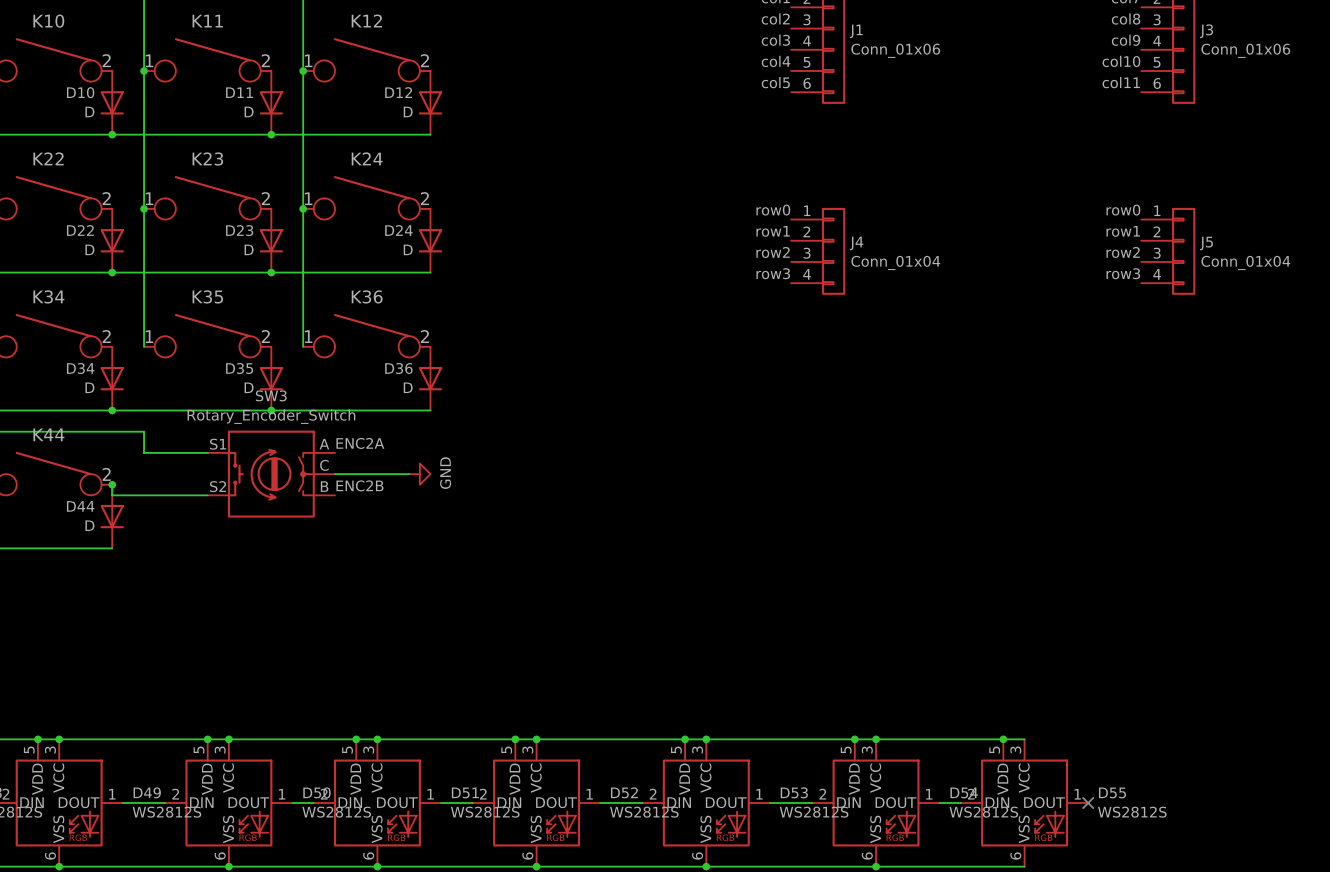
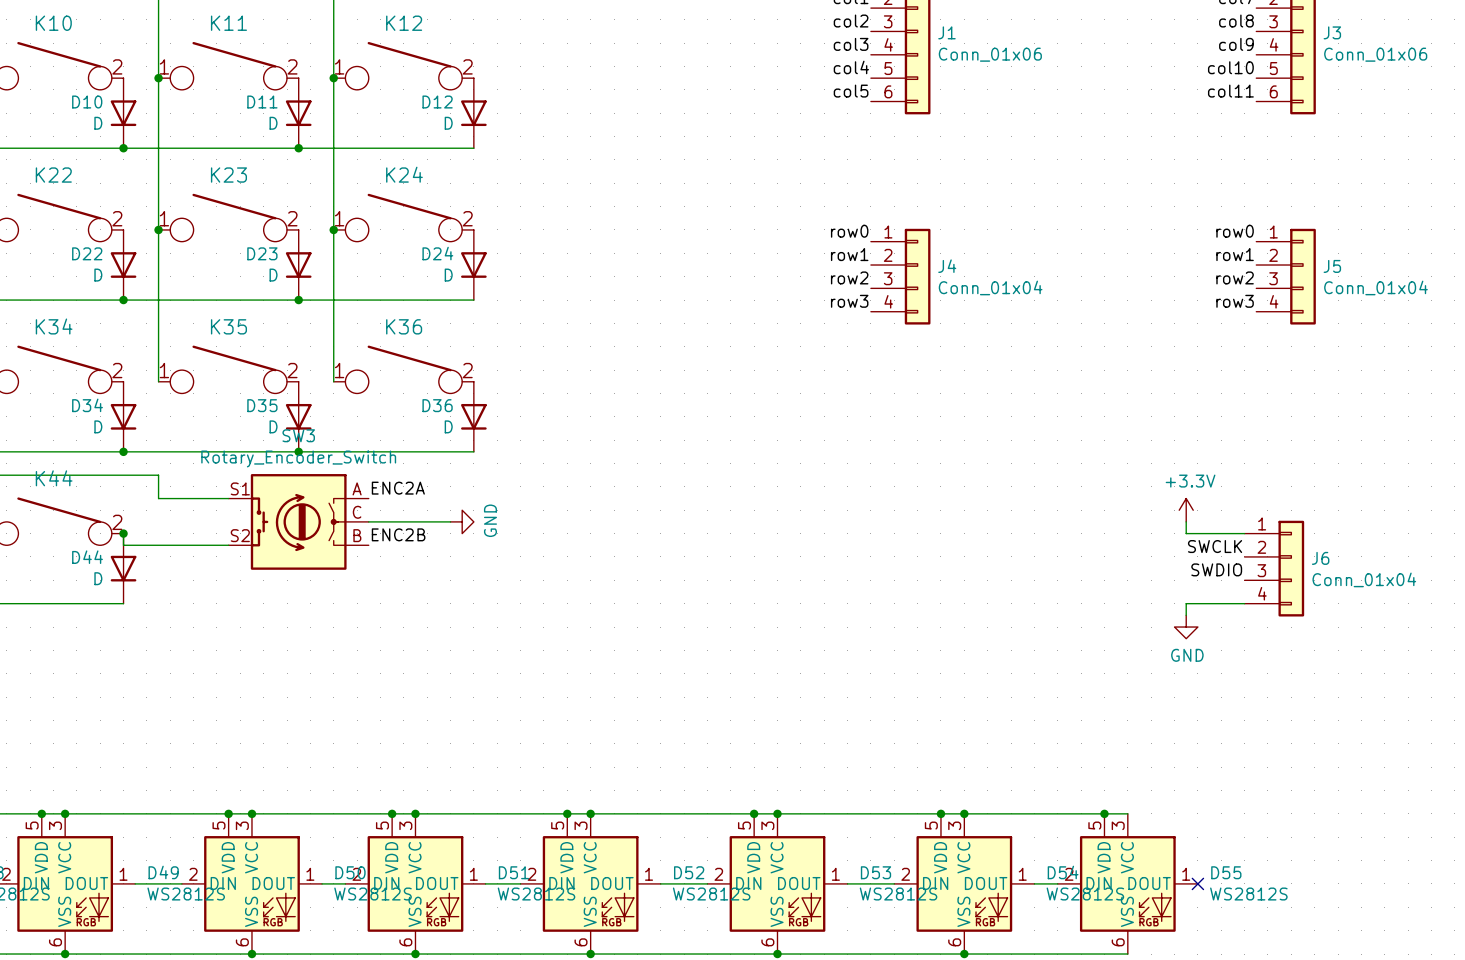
power symbol: none -> +3.3V (1186, 510)
wire: none -> (1186, 521) (1186, 533) (1244, 533)
label: none -> SWCLK (1215, 546)
J6: none -> Conn_01x04 (1274, 568)
label: none -> SWDIO (1216, 569)
wire: none -> (1244, 603) (1186, 603) (1186, 615)
power symbol: none -> GND (1186, 627)

